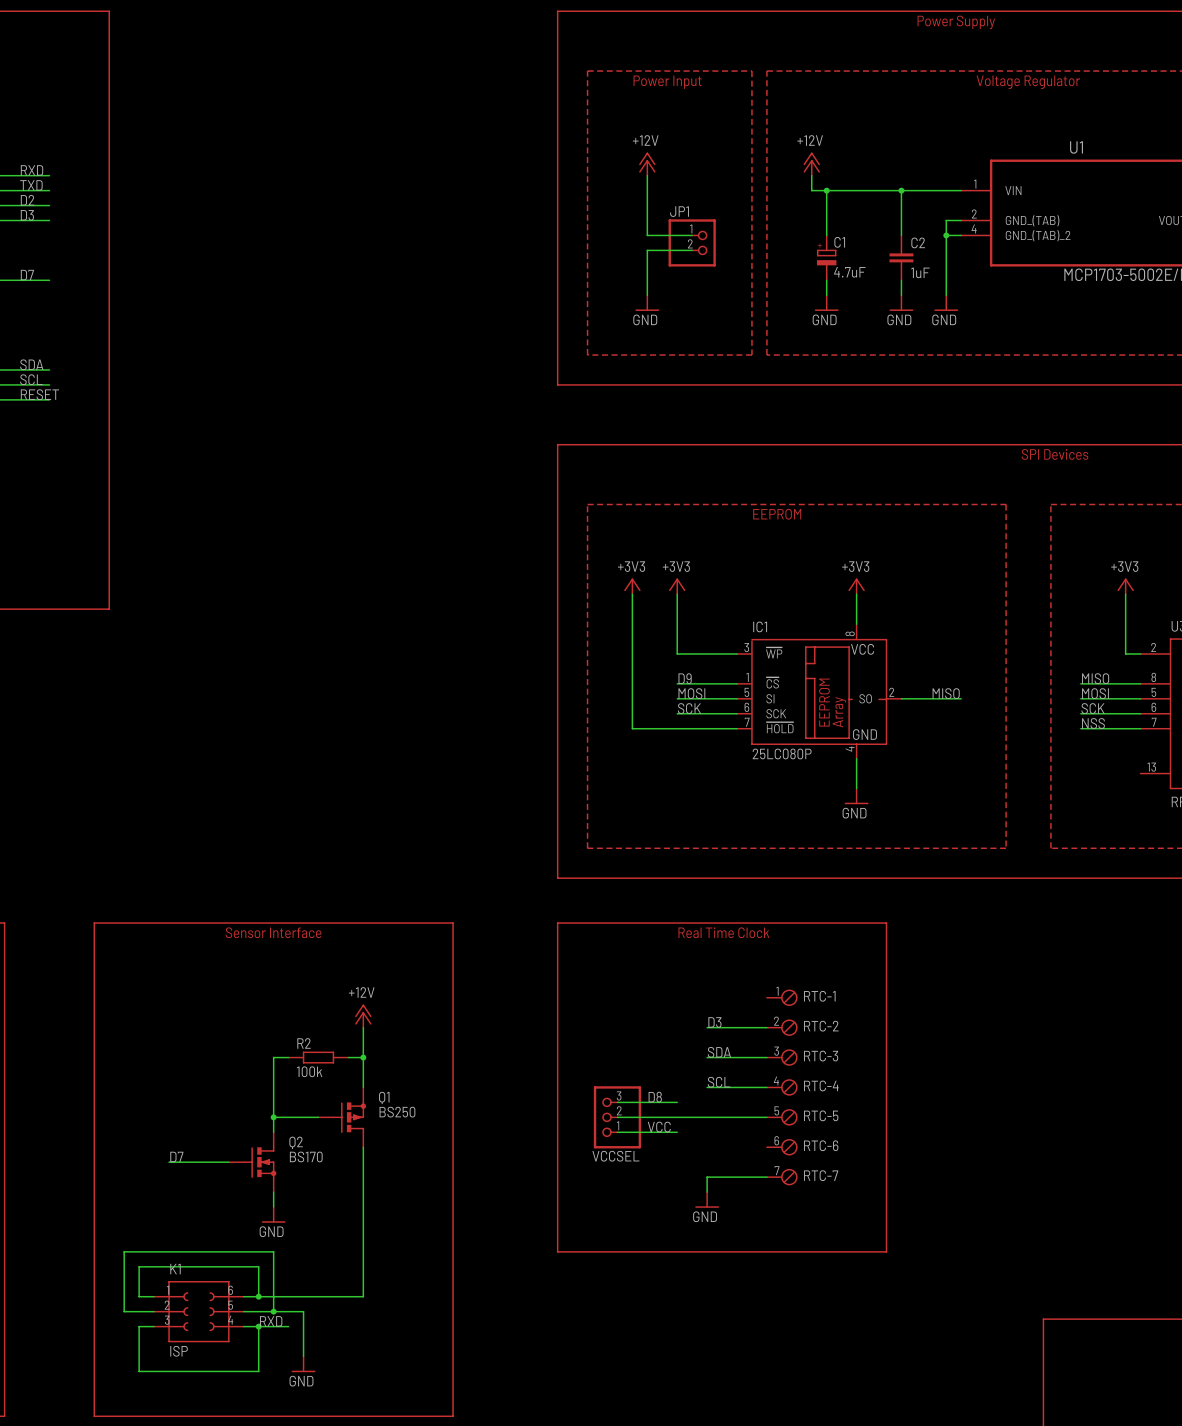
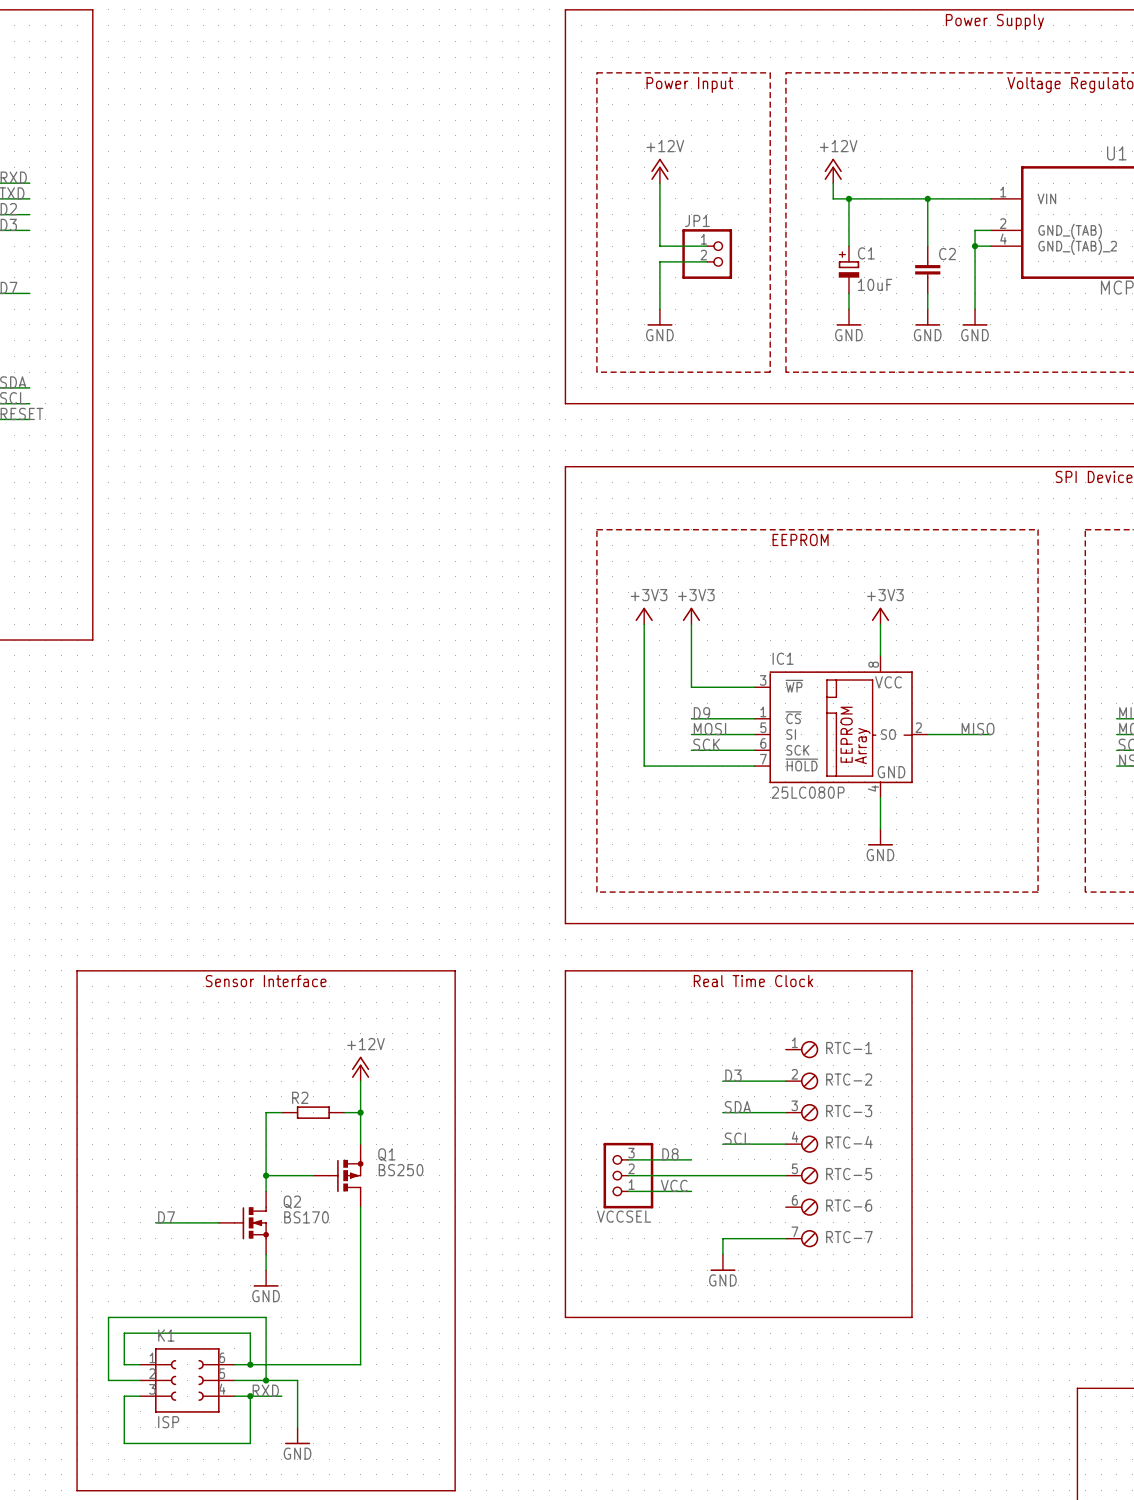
C1 value: 4.7uF (849, 272) -> 10uF (875, 284)
C2 value: 1uF (920, 272) -> none
R2 value: 100k (309, 1071) -> none

